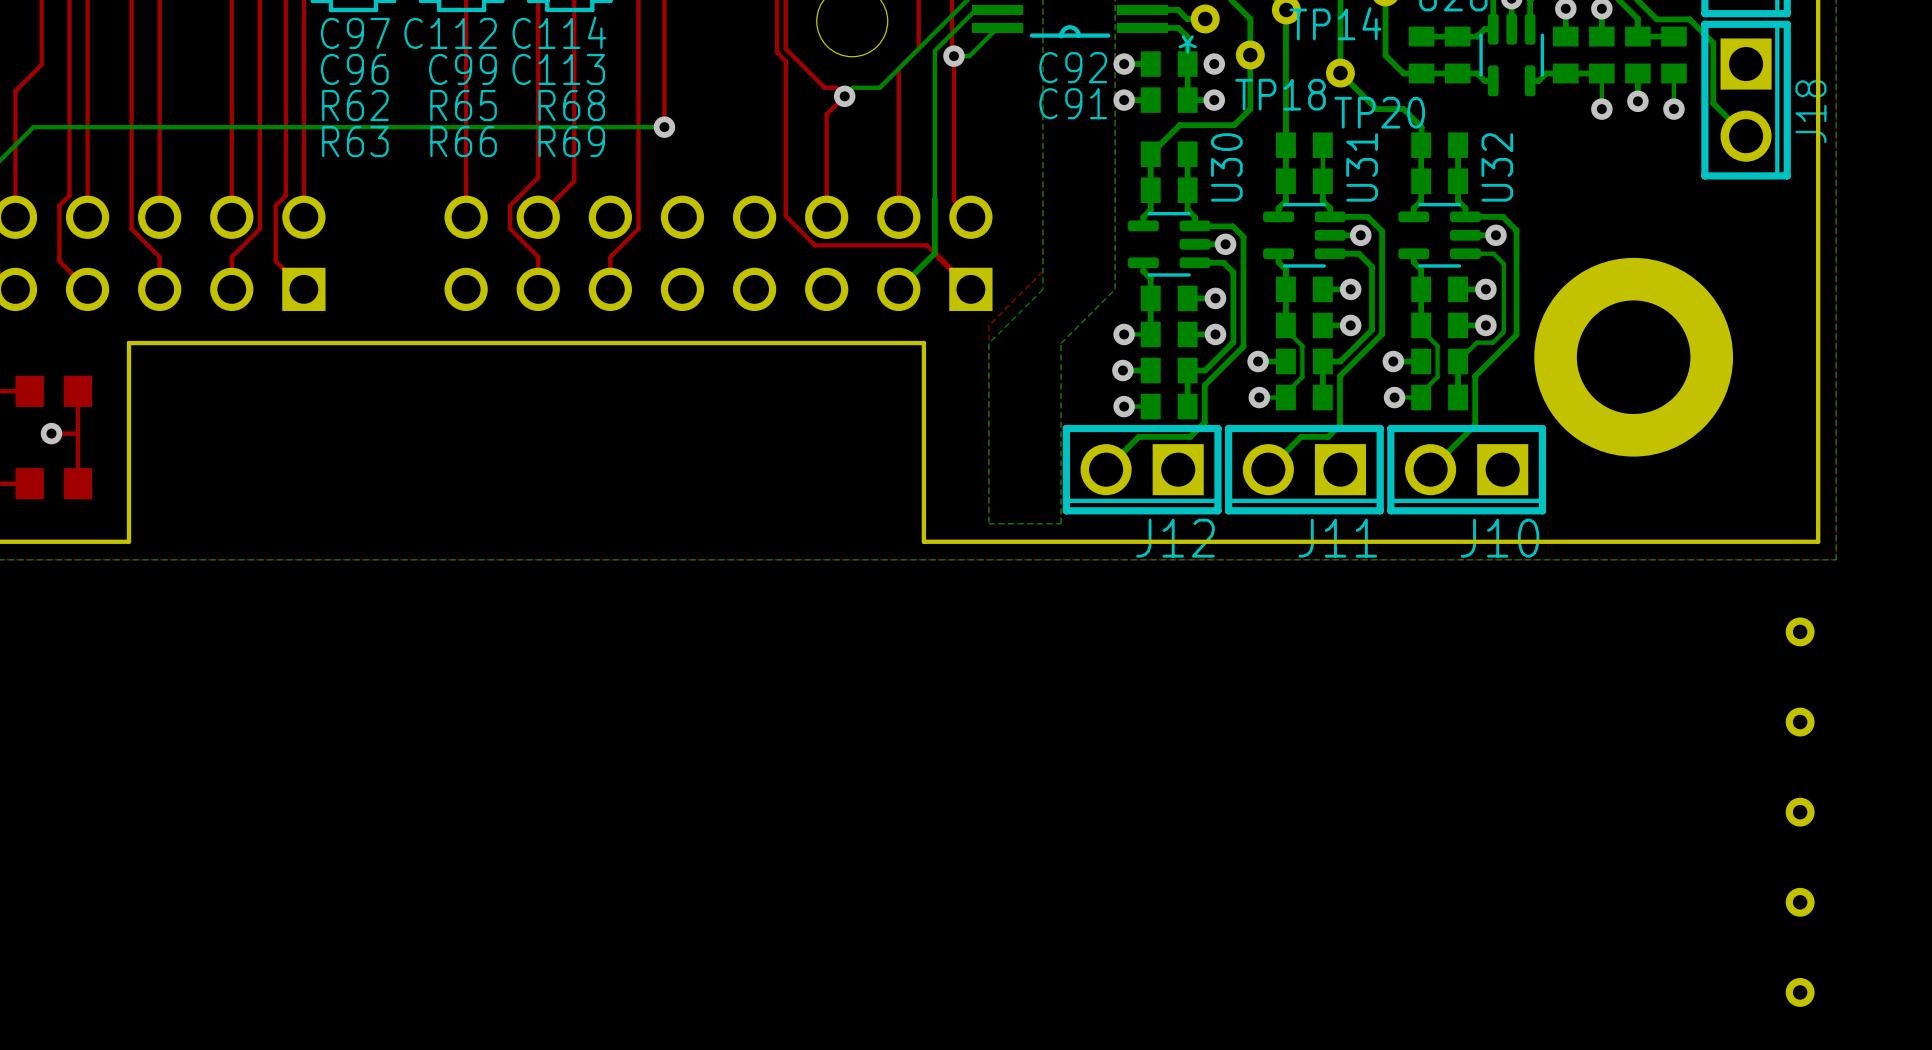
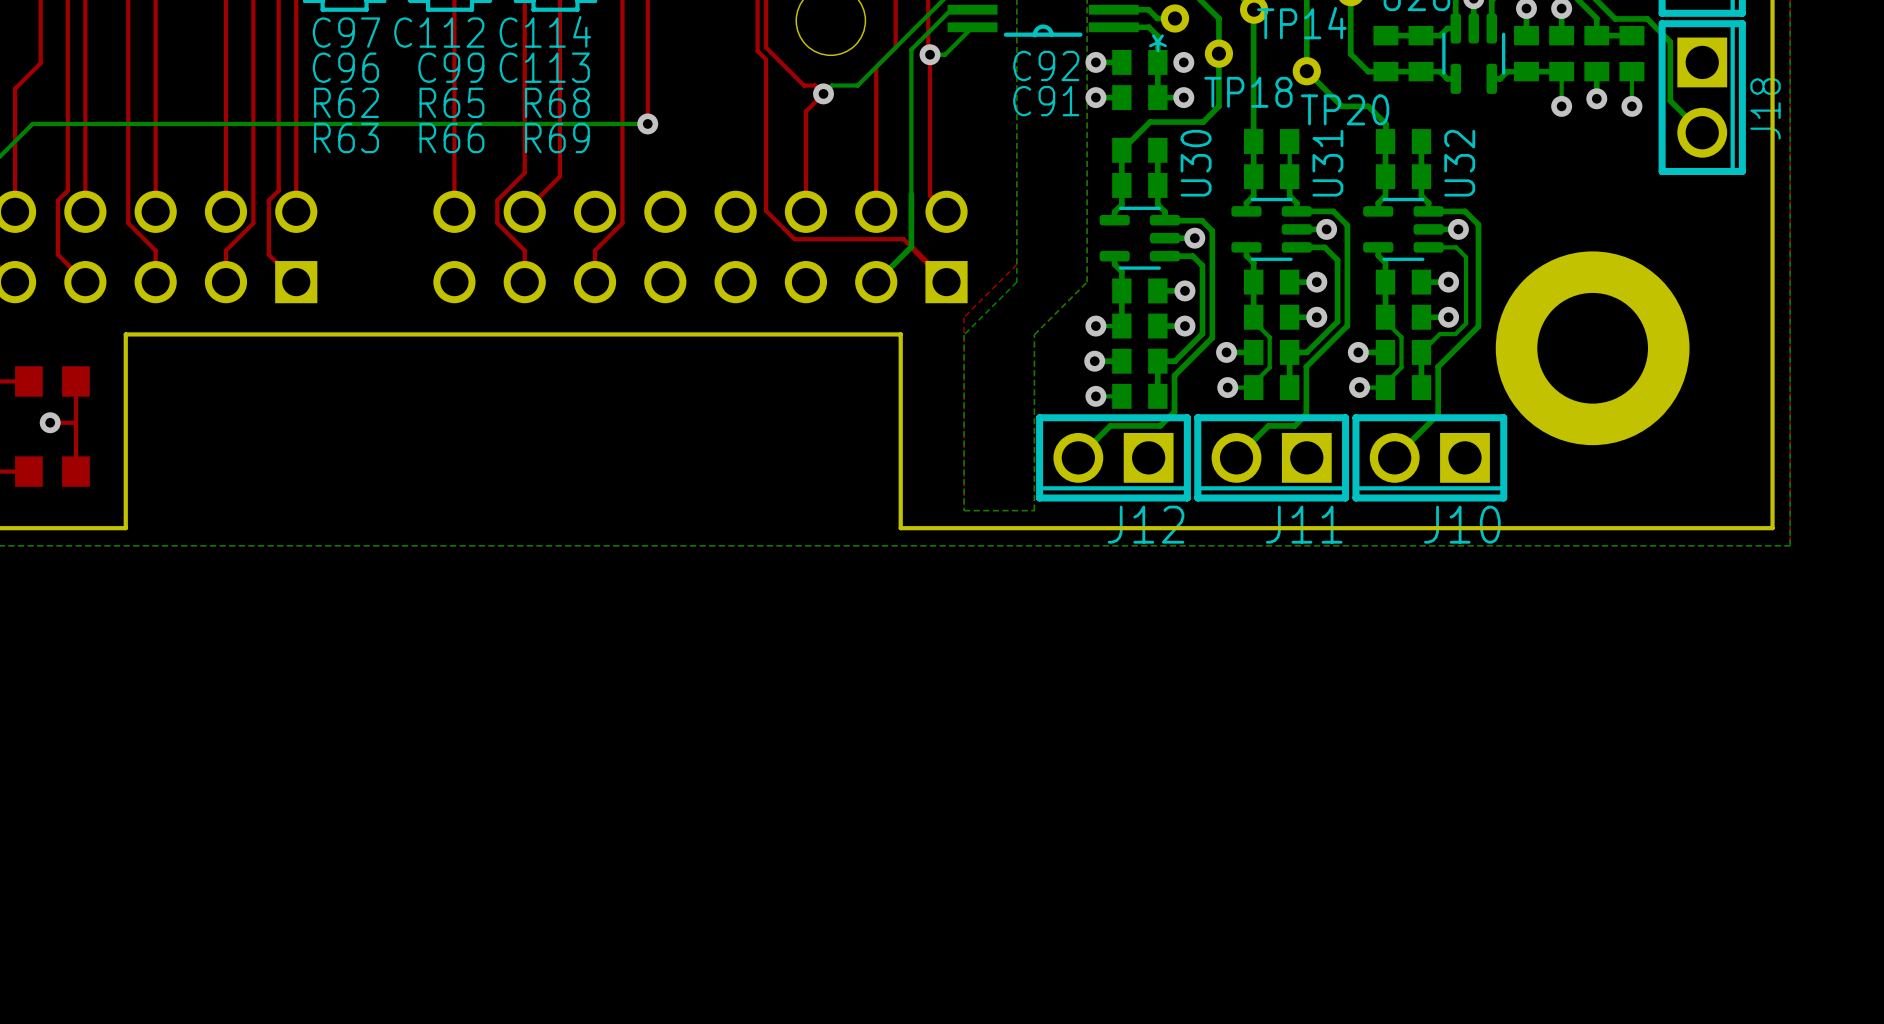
part: (1800, 631) -> none
part: (1800, 722) -> none
part: (1800, 812) -> none
part: (1800, 902) -> none
part: (1800, 992) -> none

